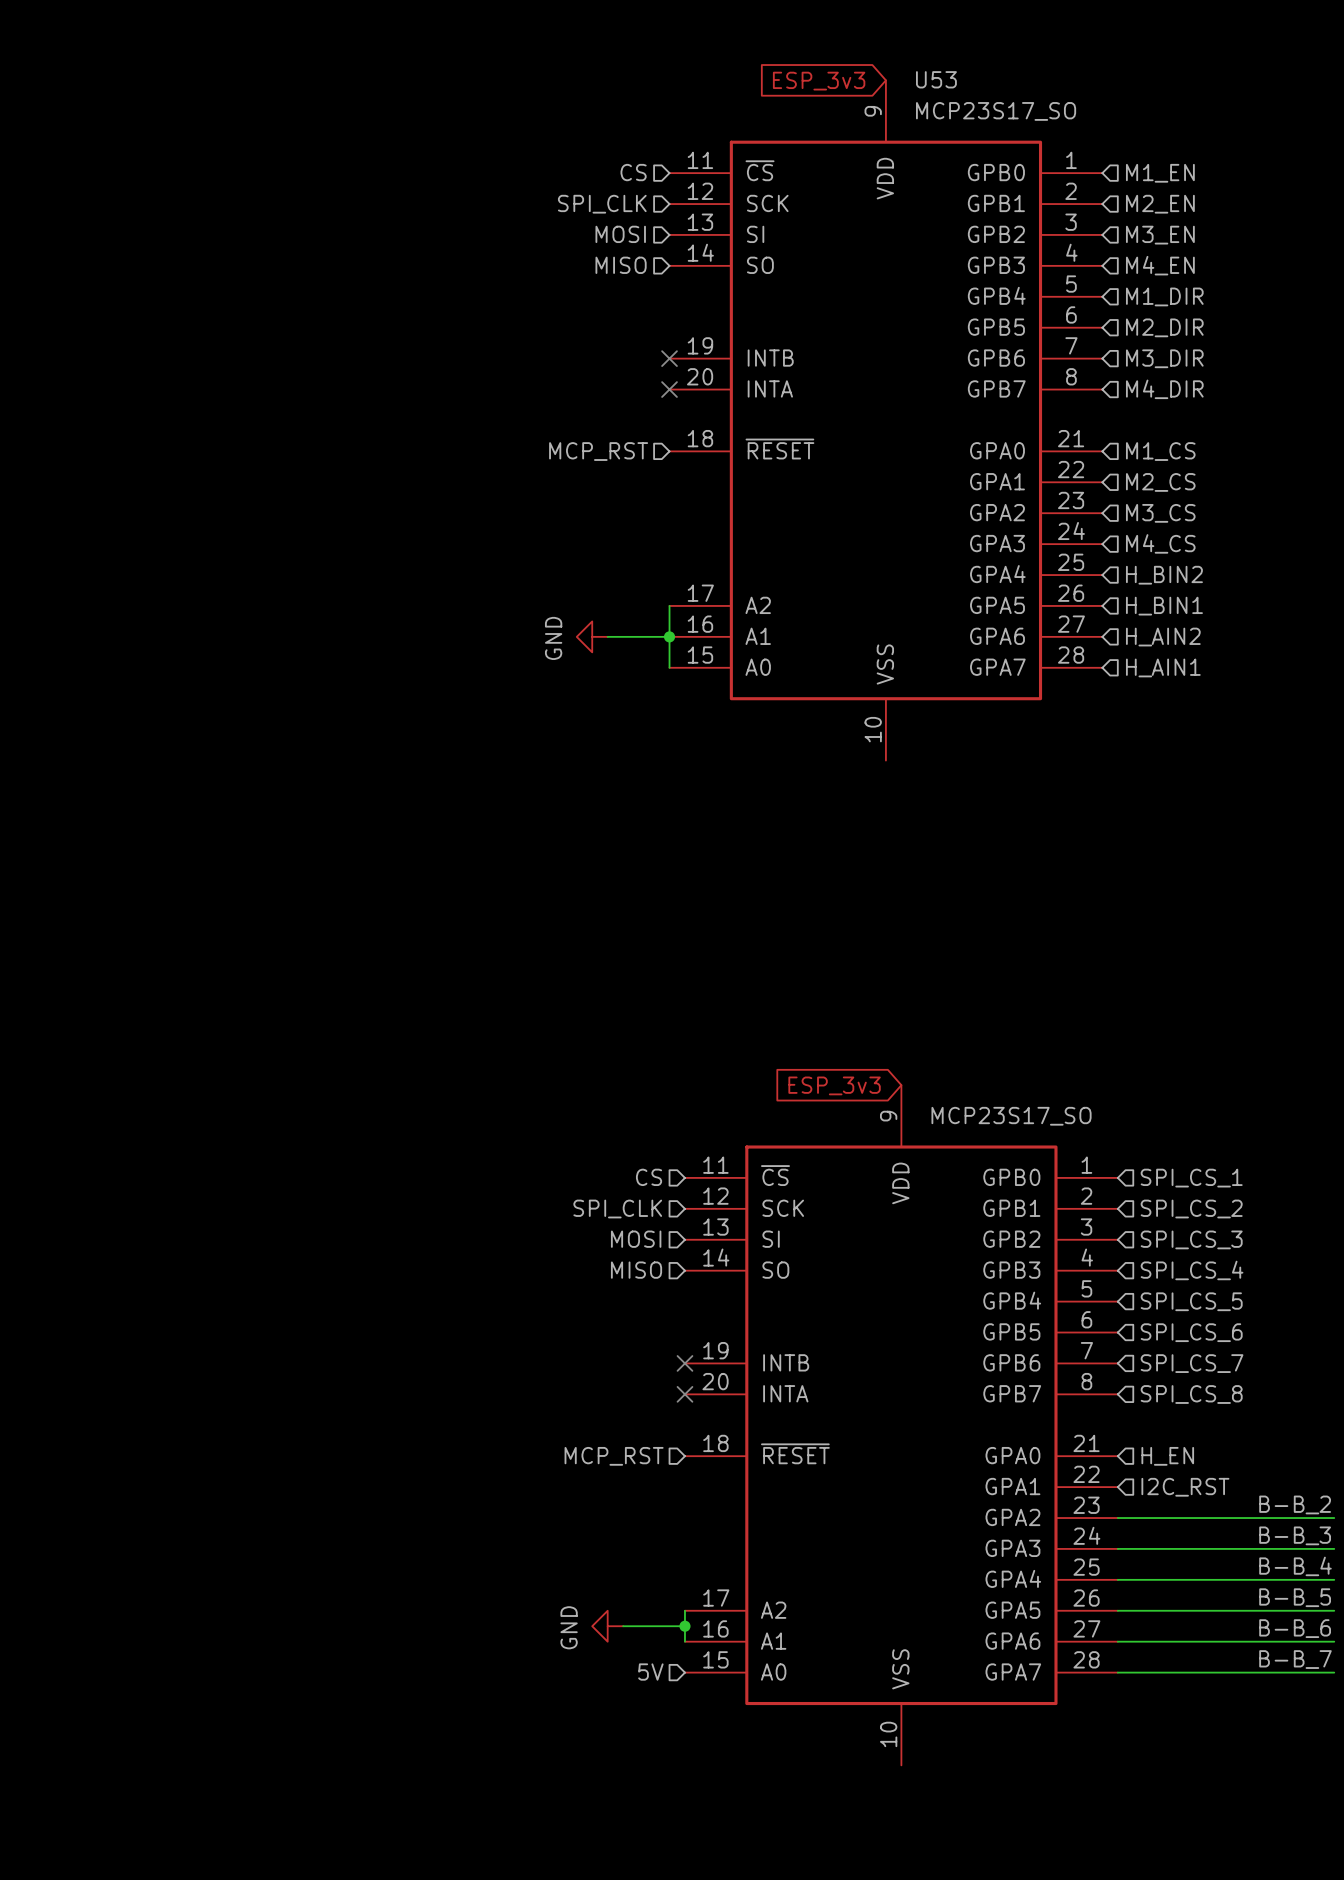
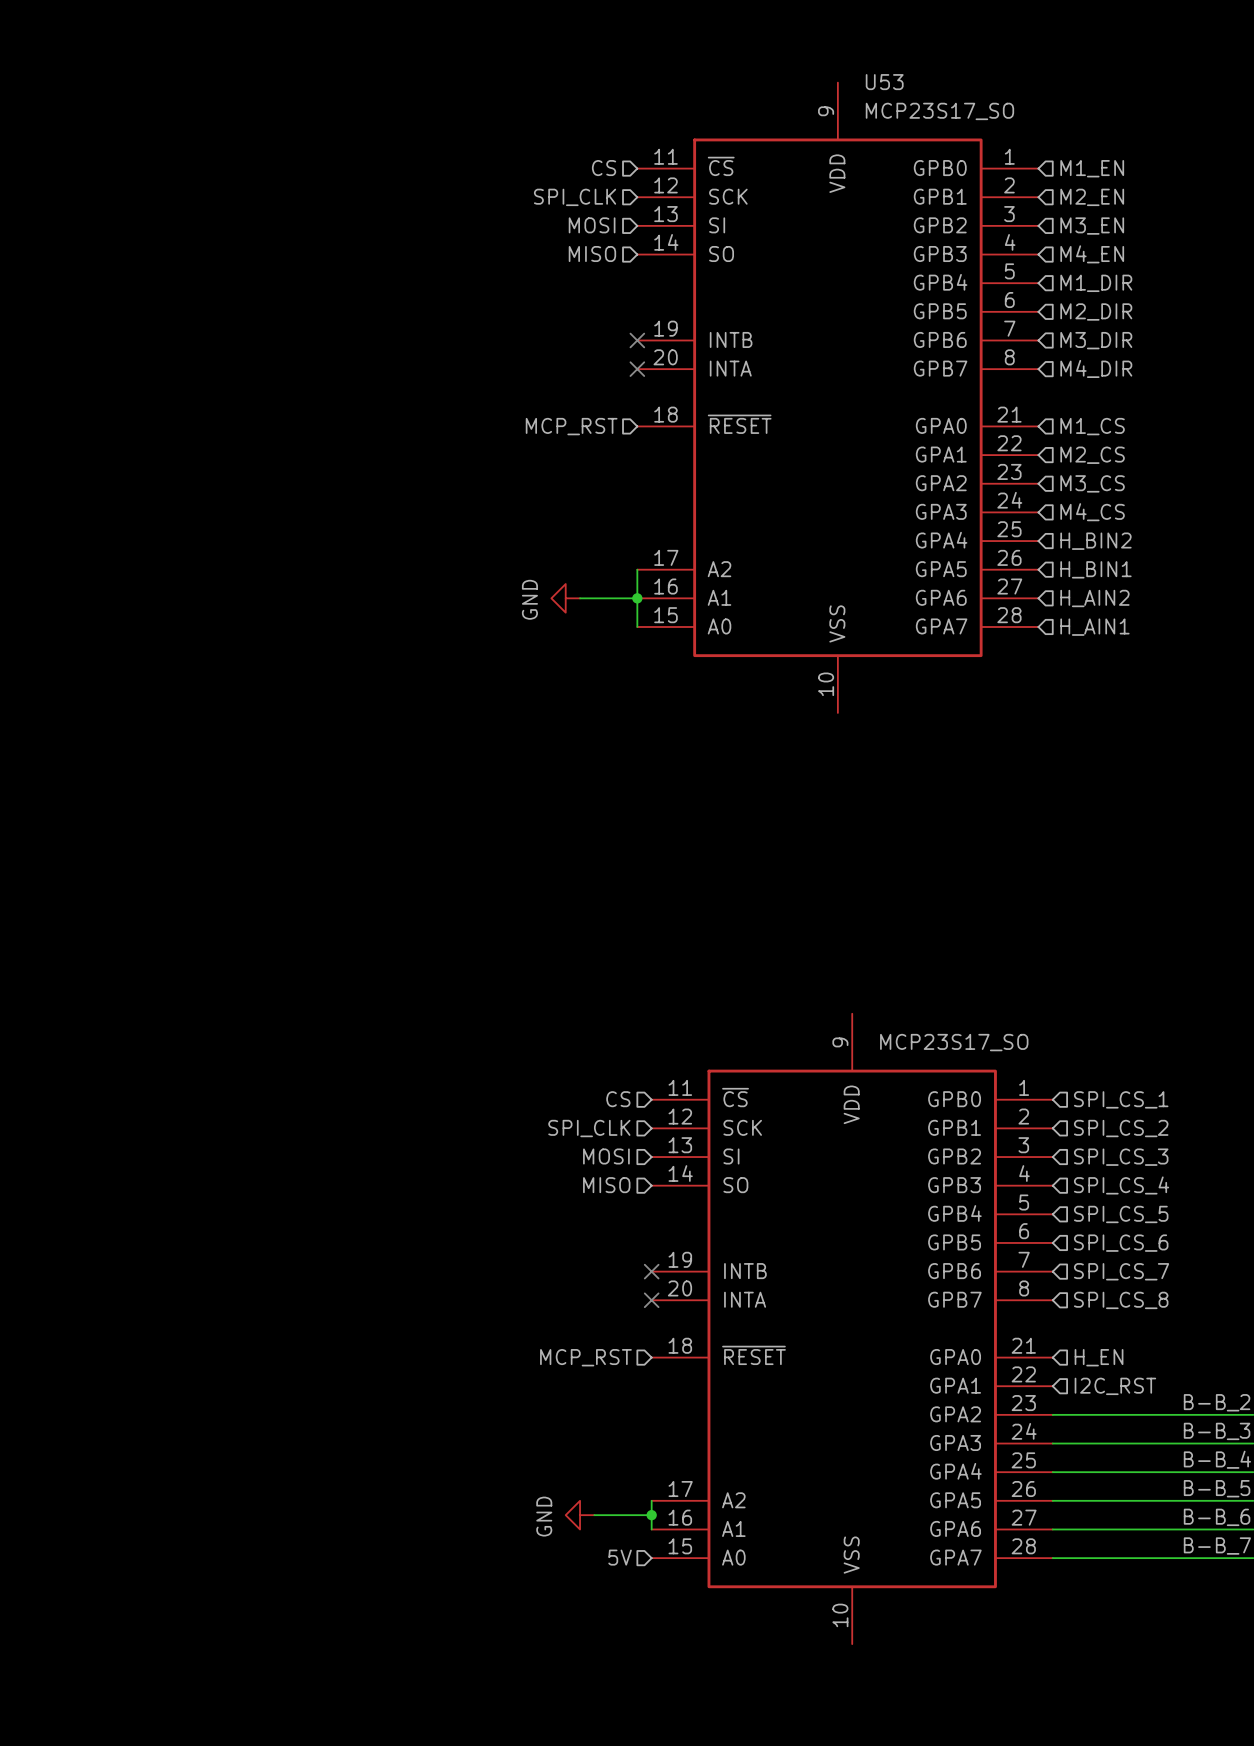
global label: ESP_3v3 (819, 81) -> none
global label: ESP_3v3 (834, 1085) -> none

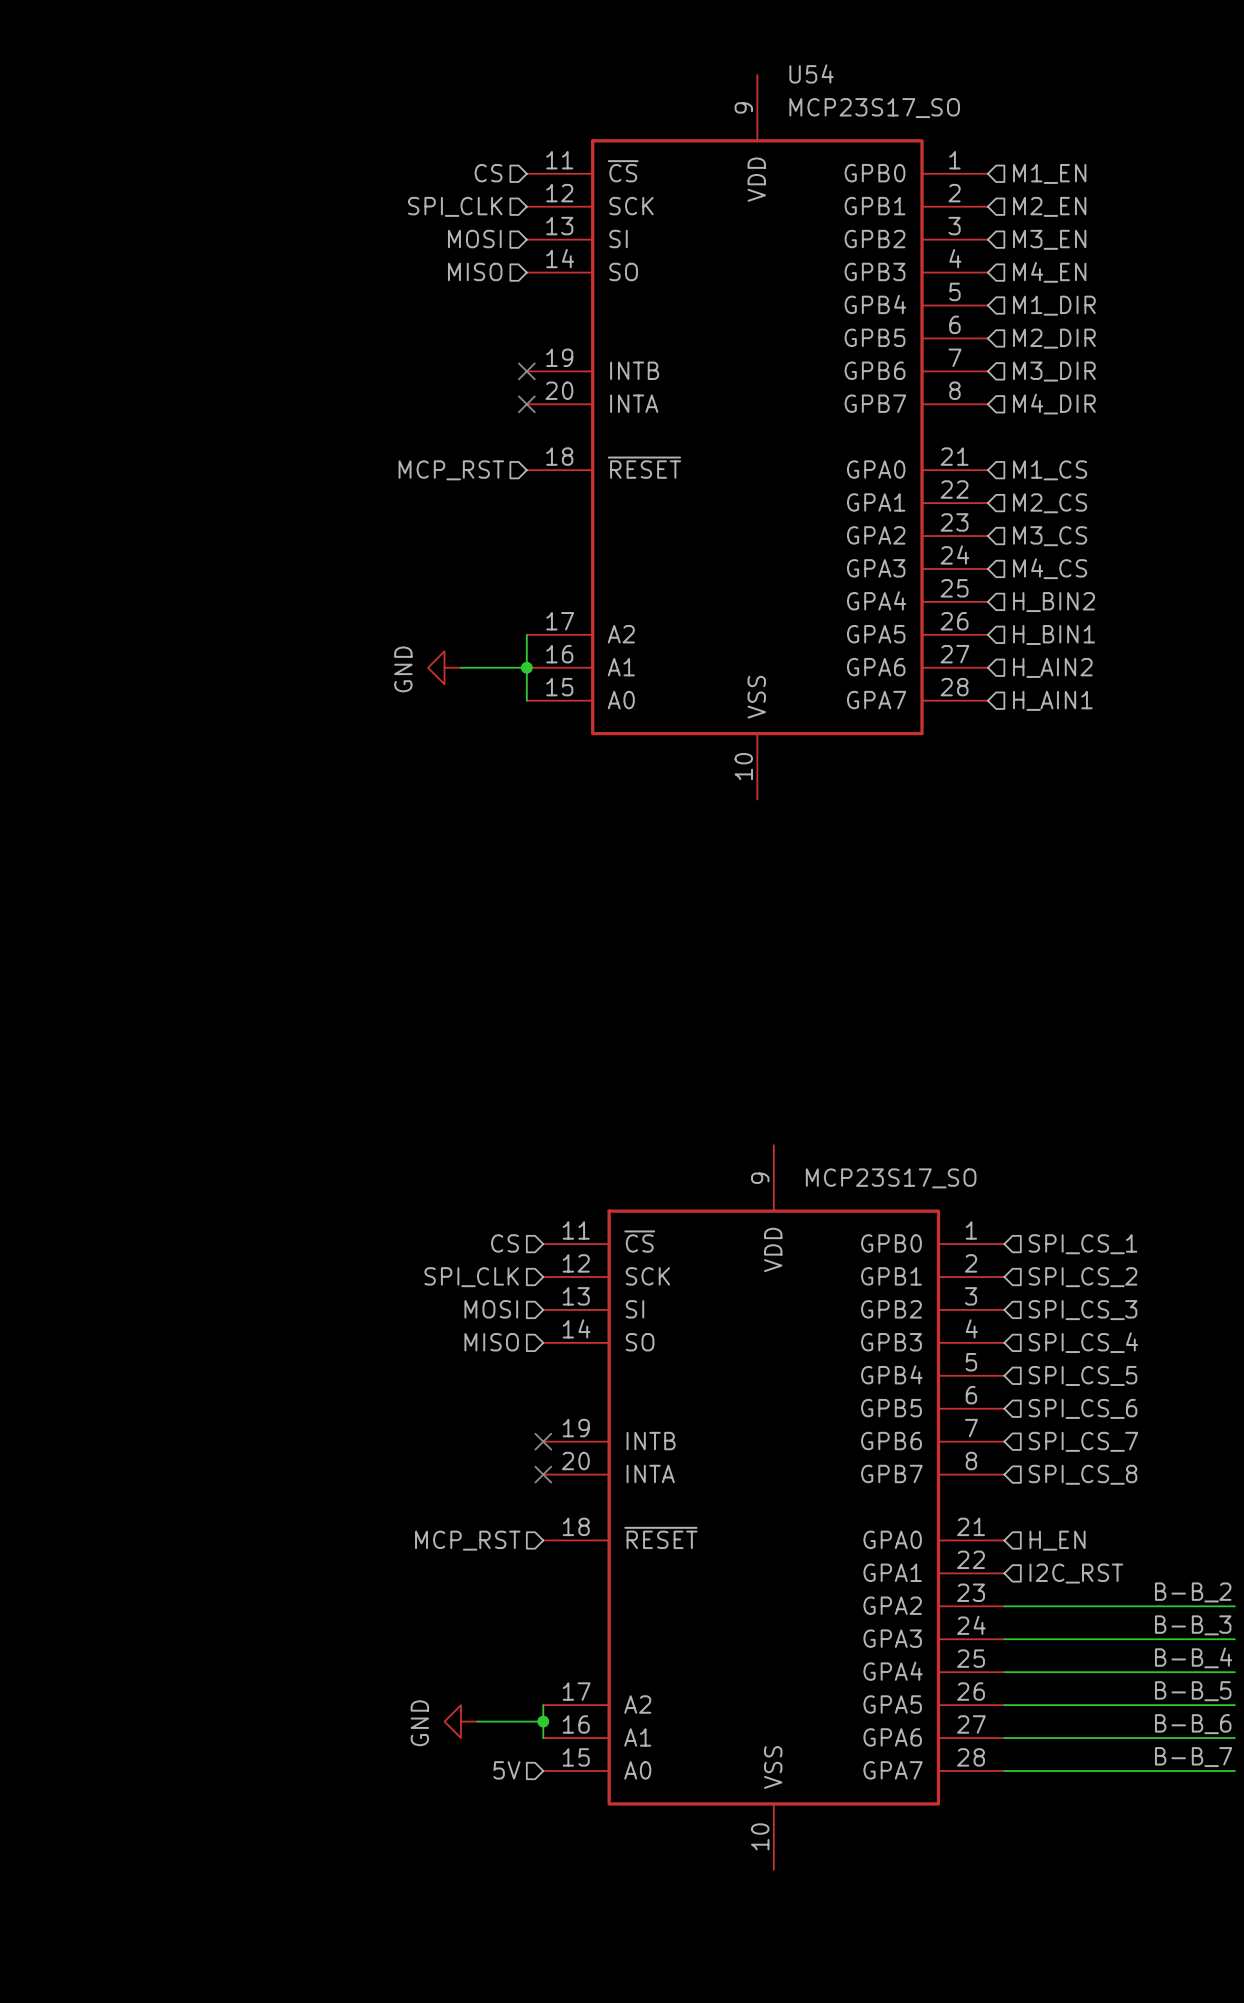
U53 name: U53 (884, 82) -> U54 (811, 73)

